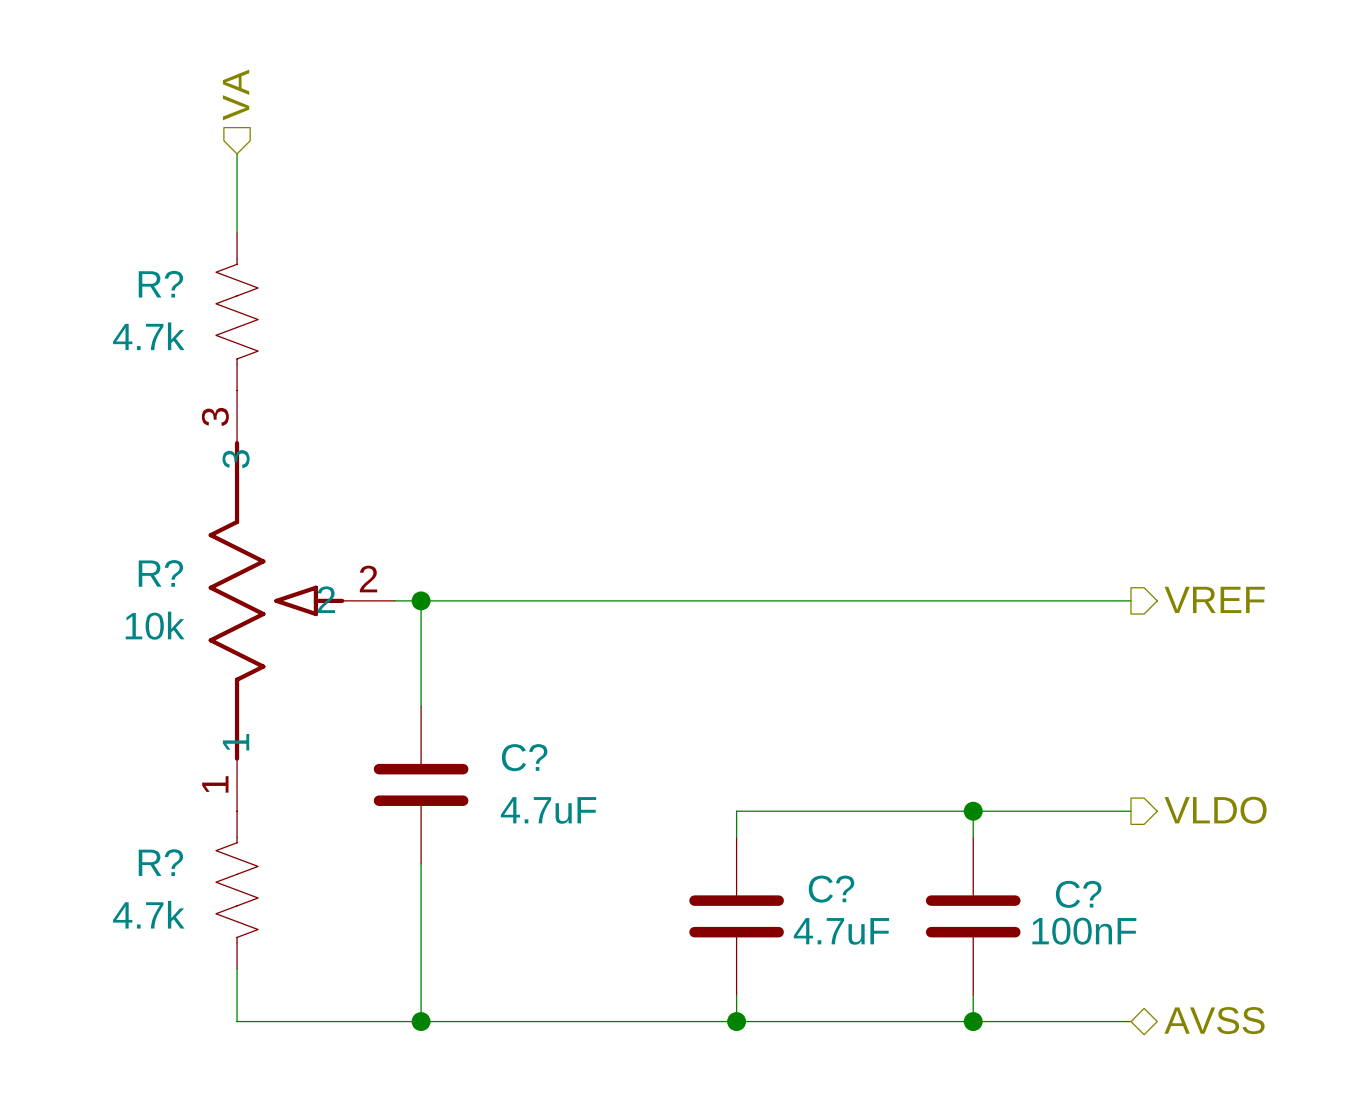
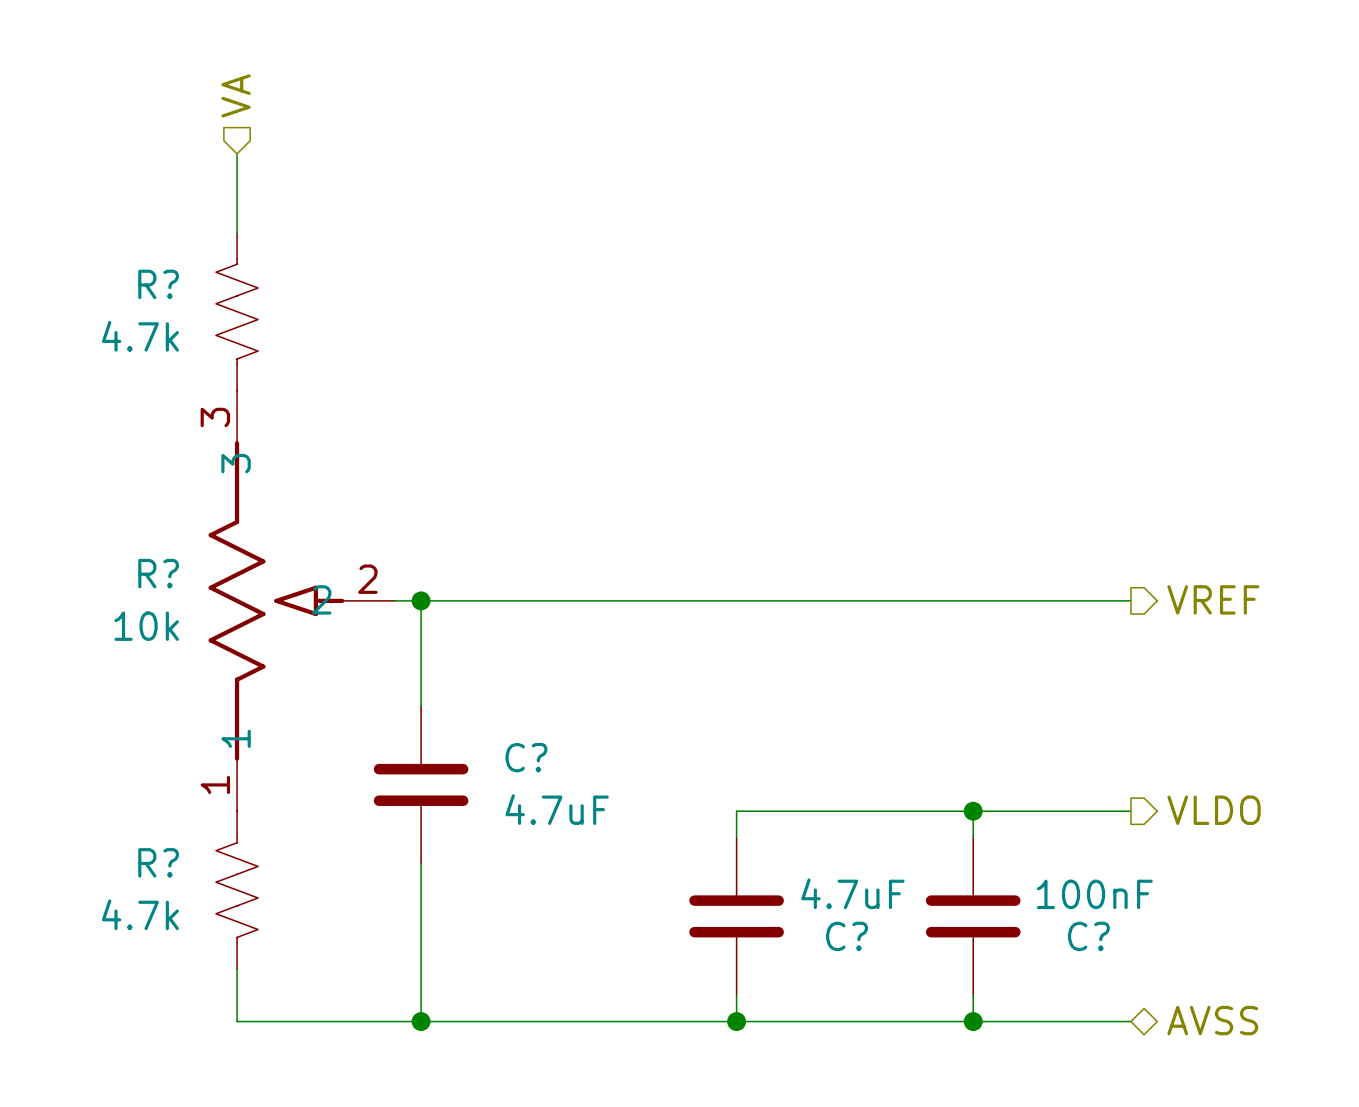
C? name position: C? (831, 889) -> C? (847, 936)
C? name position: C? (1078, 894) -> C? (1088, 936)
C? value position: 4.7uF (841, 931) -> 4.7uF (852, 893)
C? value position: 100nF (1084, 931) -> 100nF (1094, 894)

